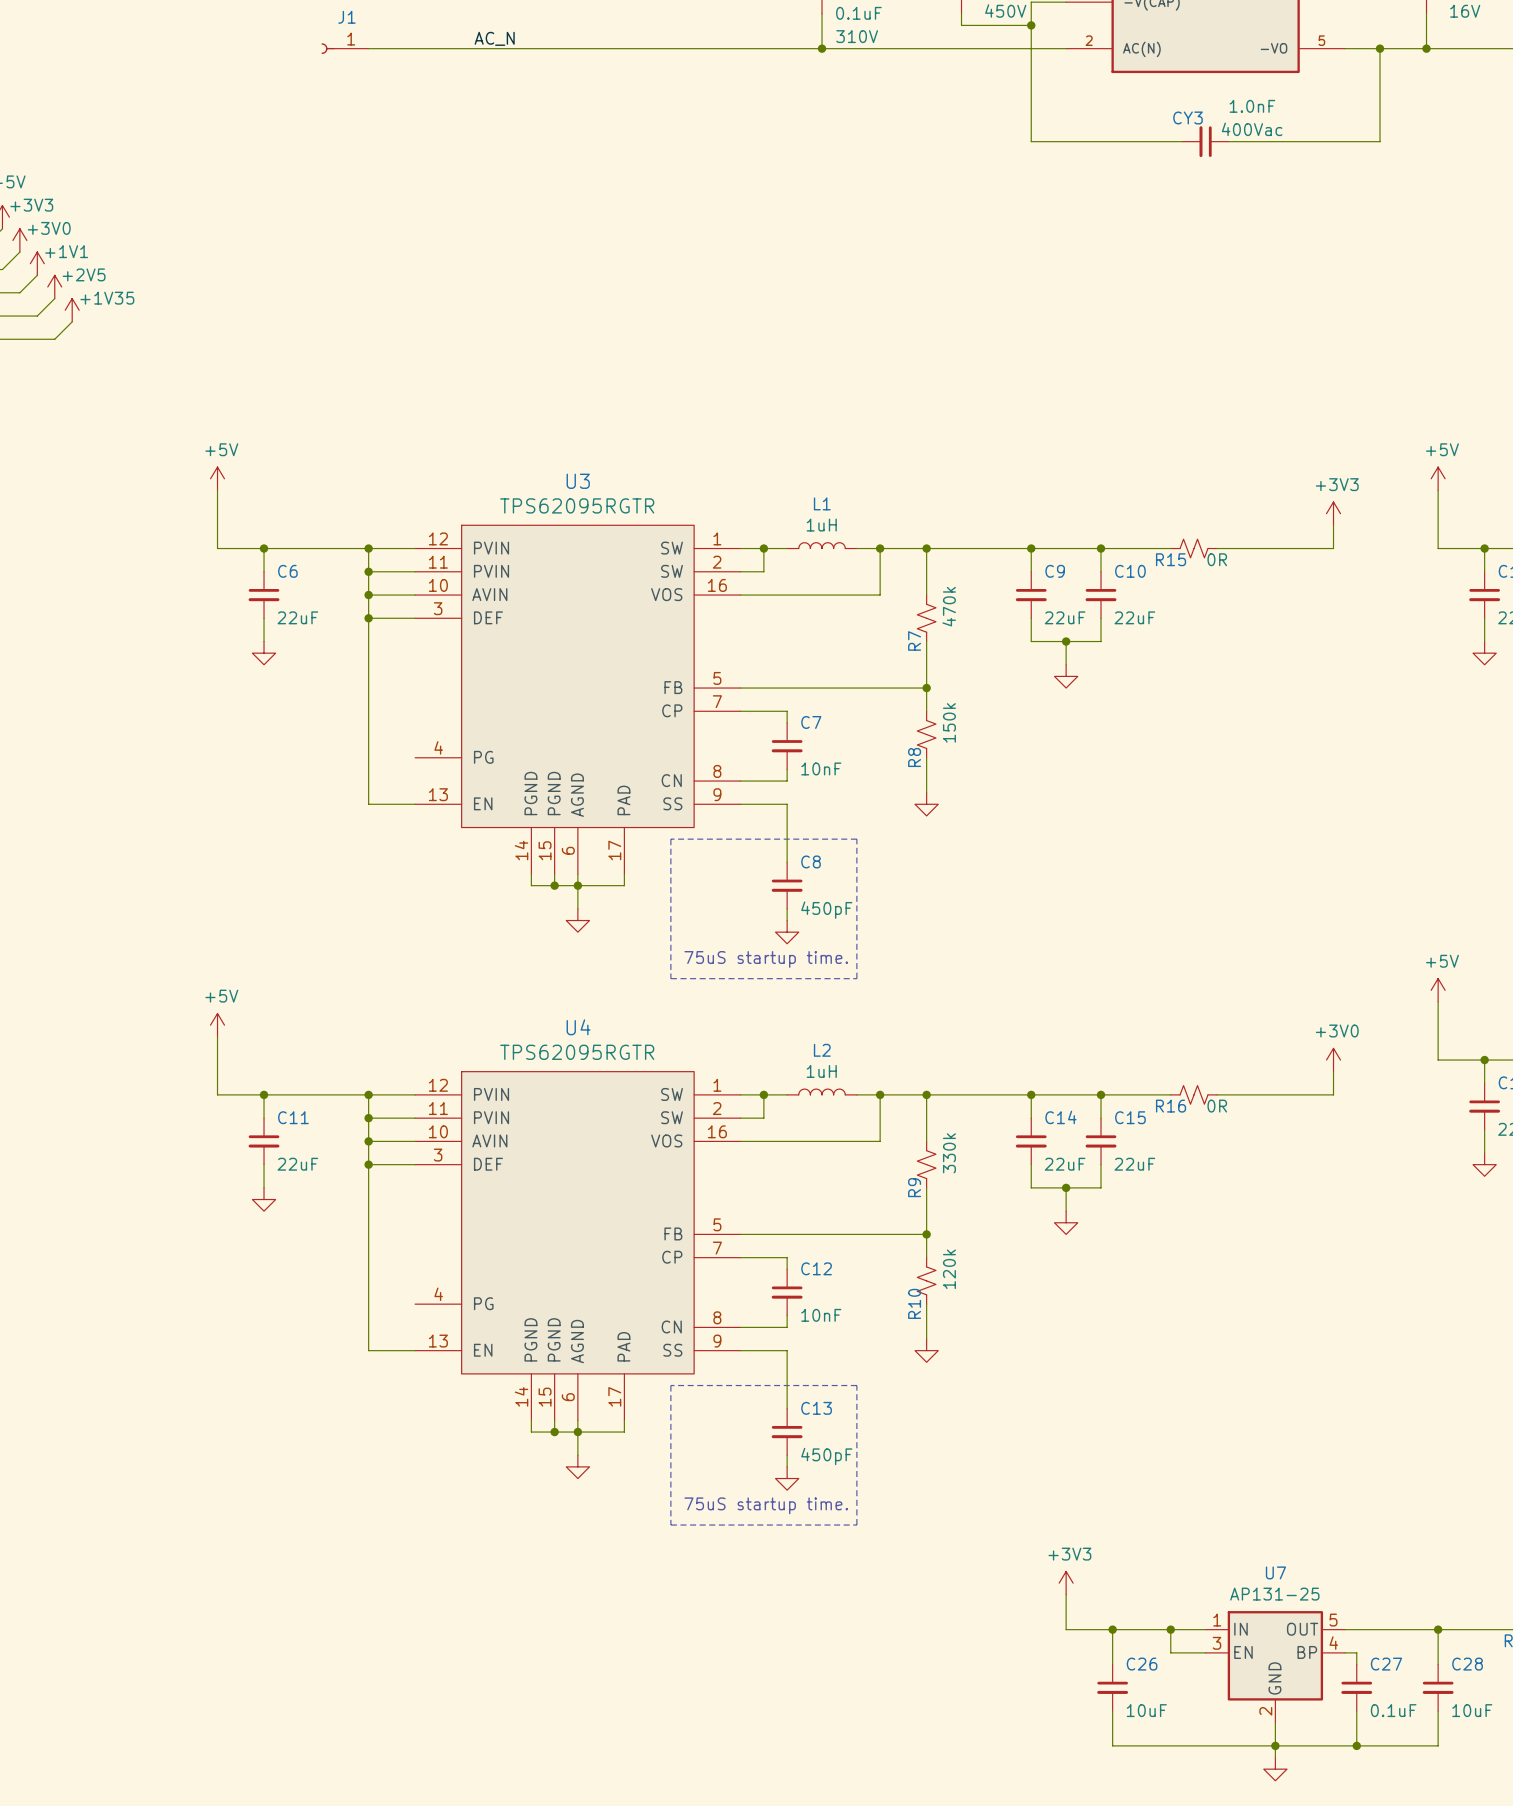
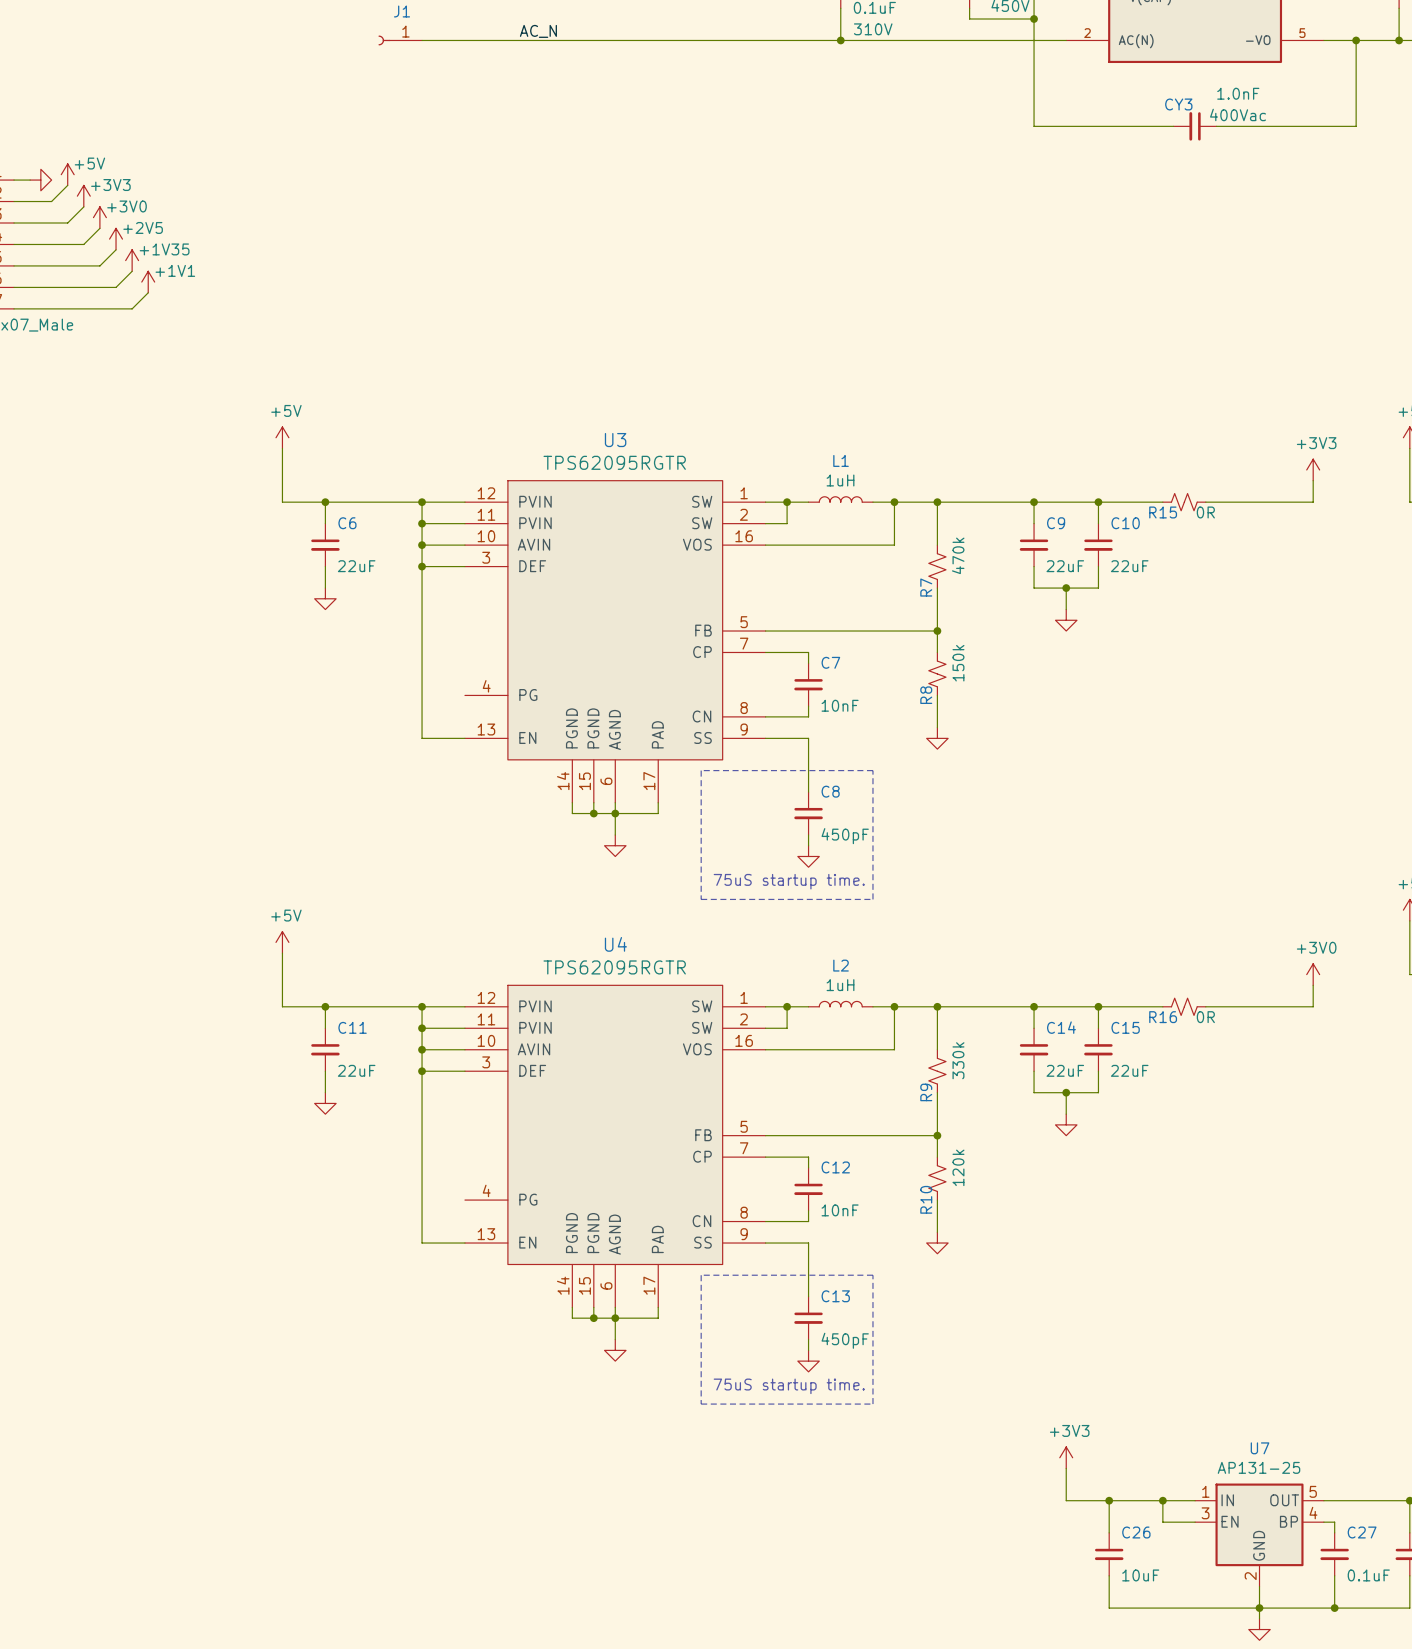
power symbol: +1V1 (37, 263) -> +2V5 (116, 239)
power symbol: +2V5 (54, 286) -> +1V35 (132, 260)
power symbol: +1V35 (72, 310) -> +1V1 (148, 282)

